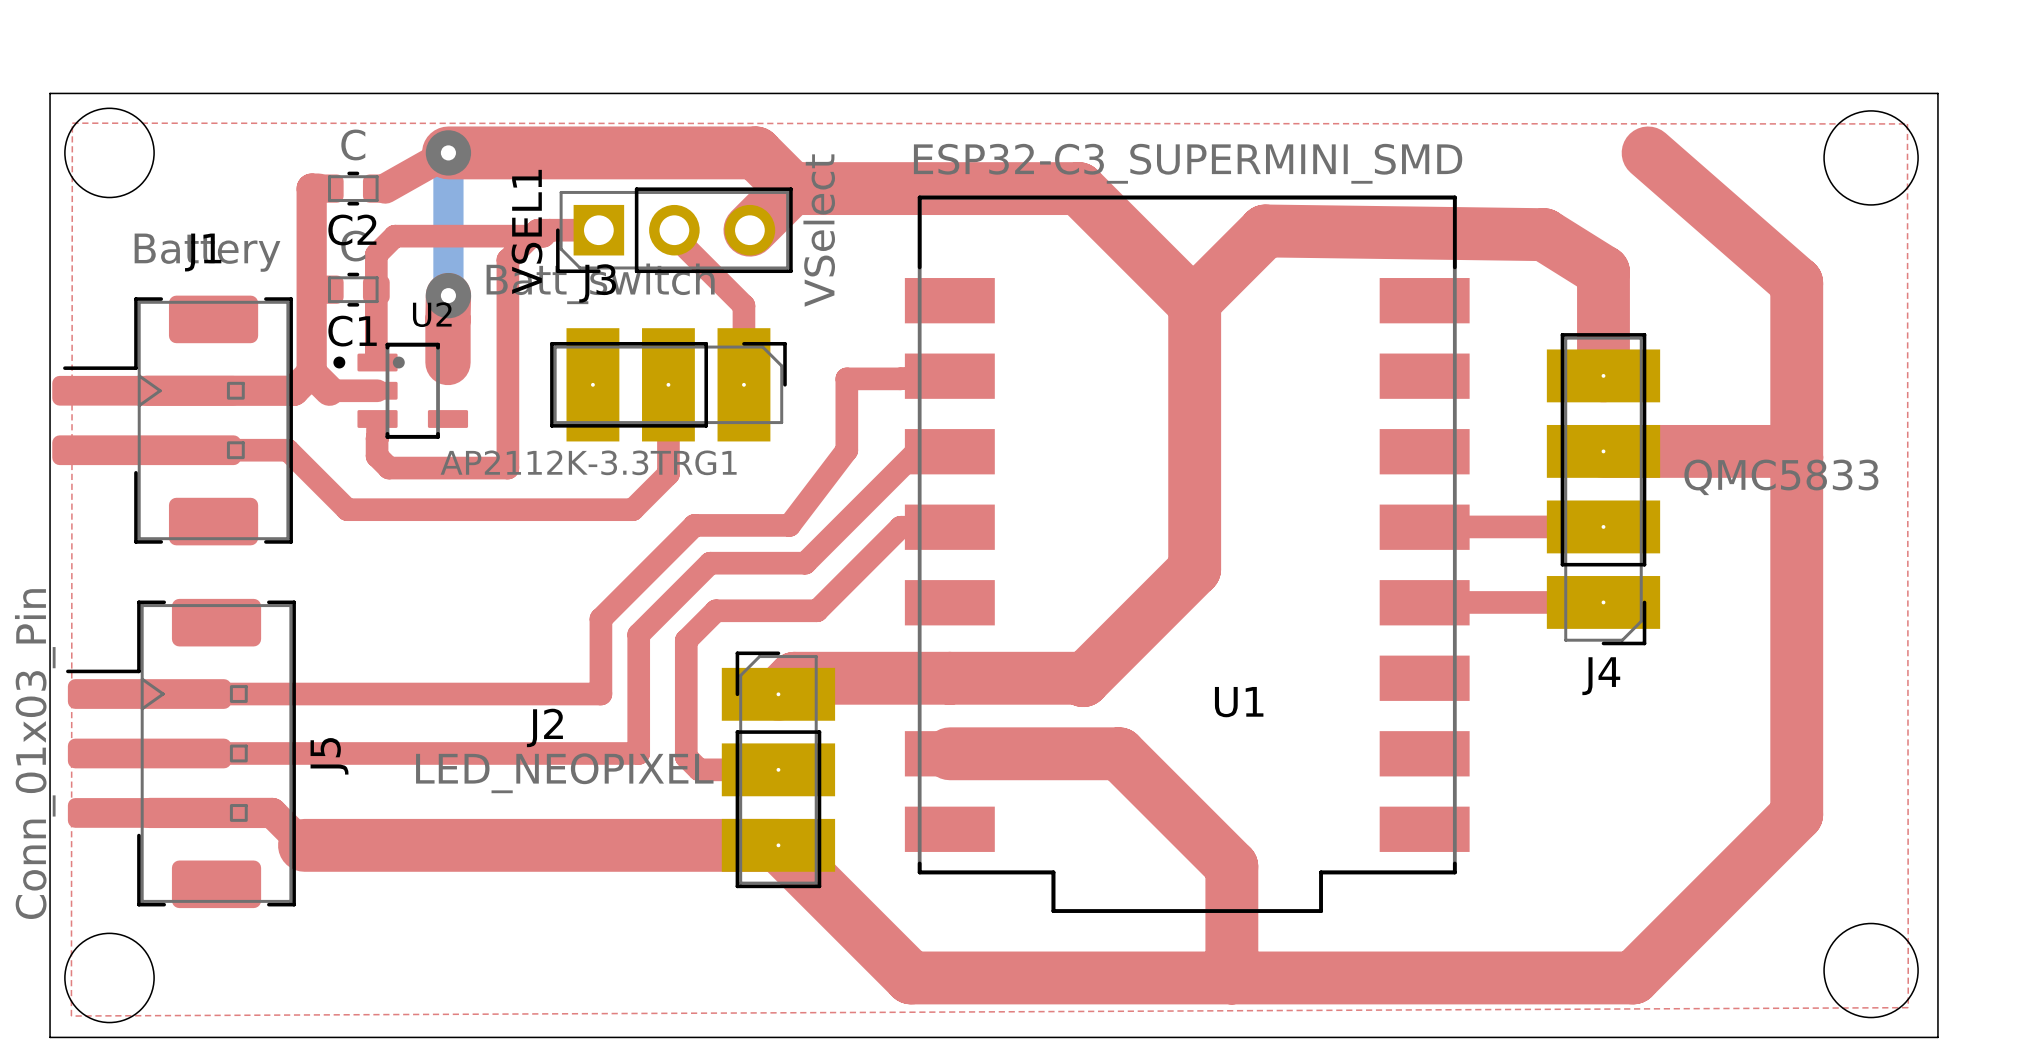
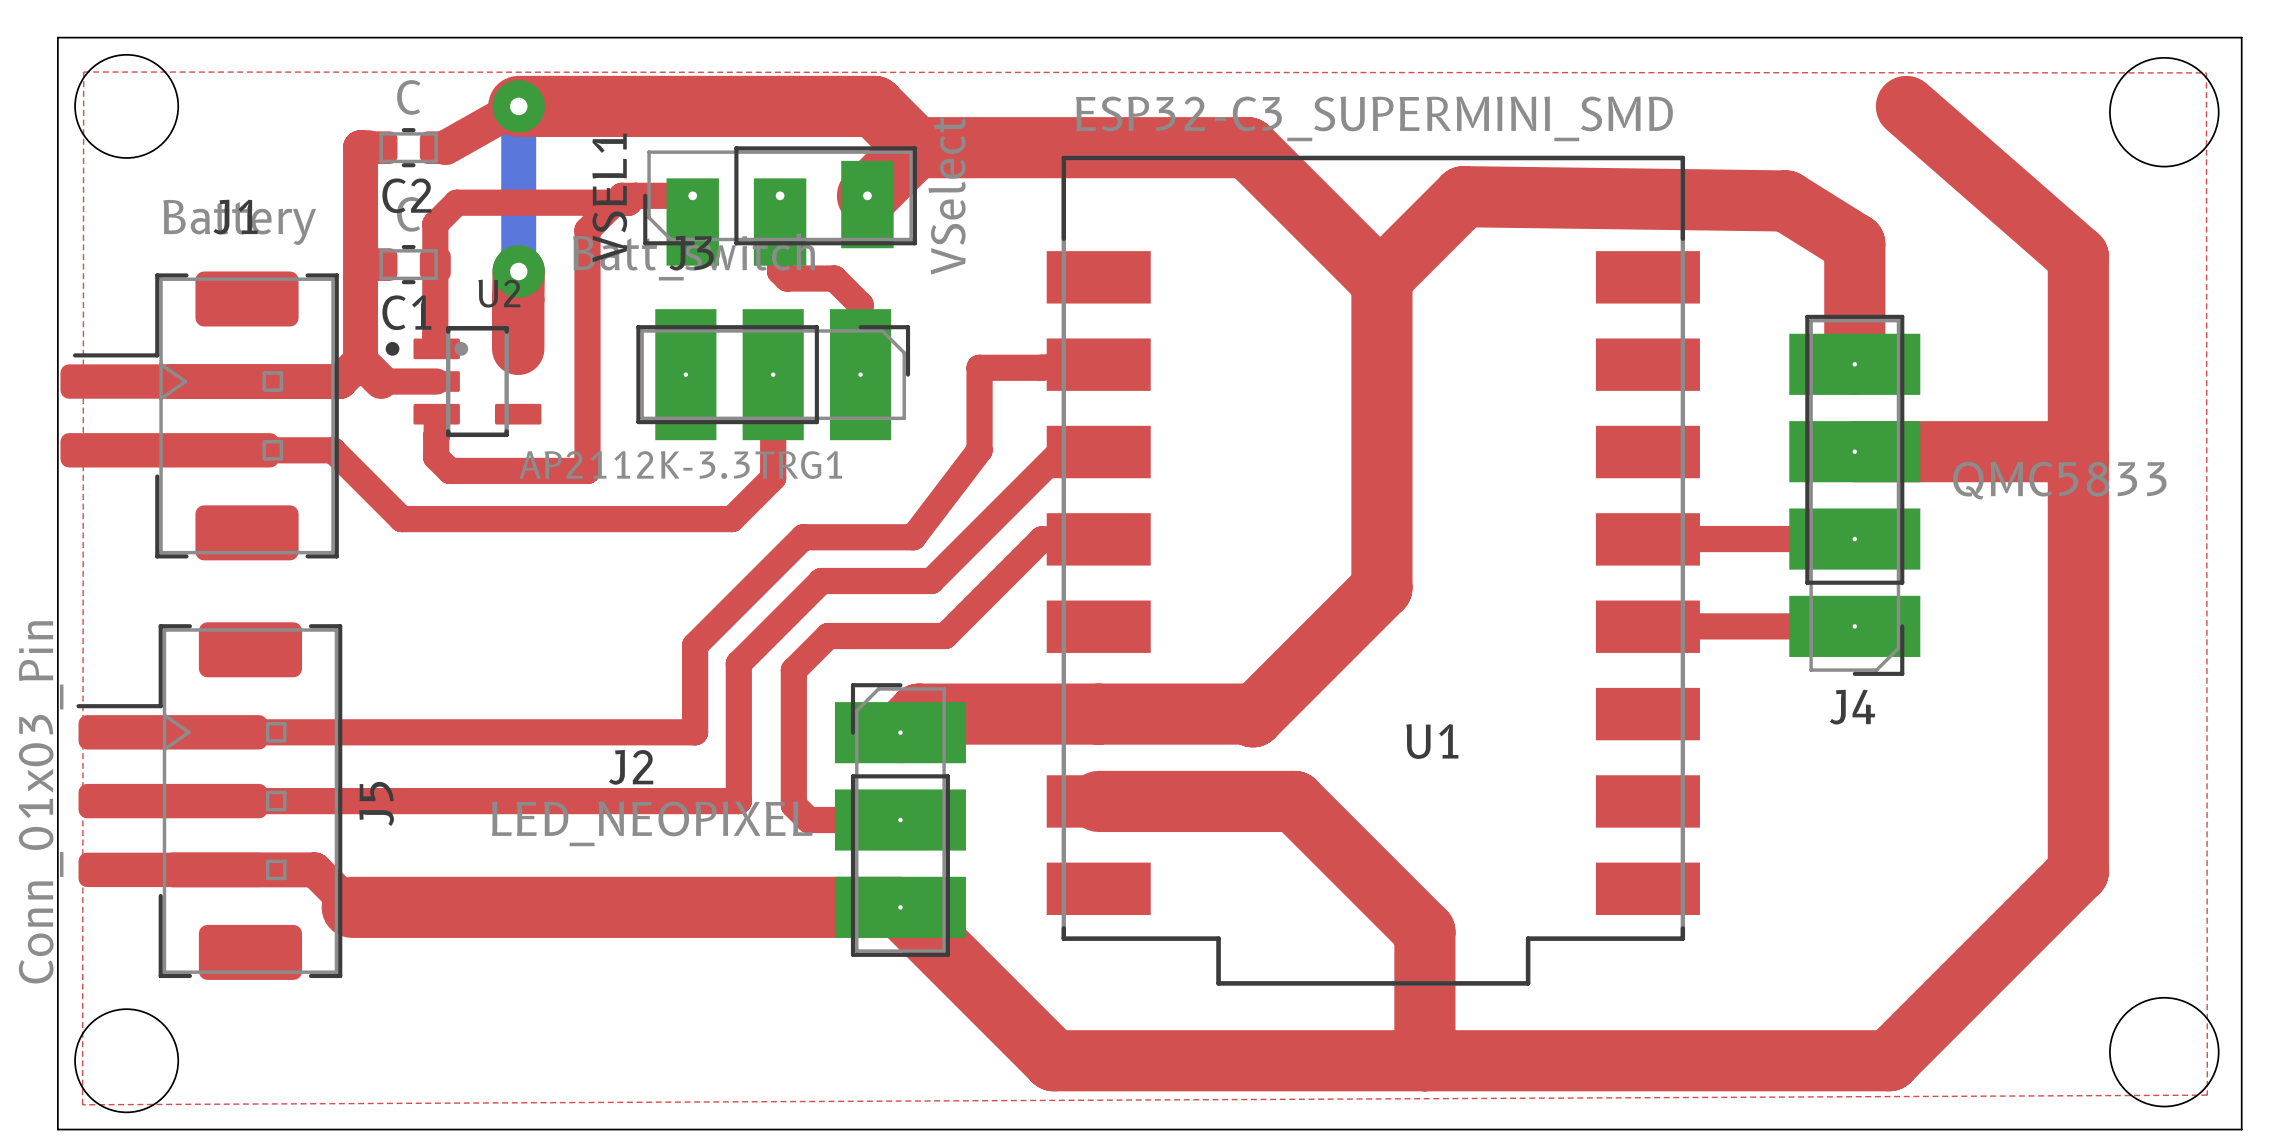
VSEL1 footprint: [556, 187, 793, 274] -> [643, 146, 917, 266]
top track: (674, 236) (743, 305) (743, 324) -> (780, 202) (780, 271) (787, 278) (834, 278) (860, 304)

